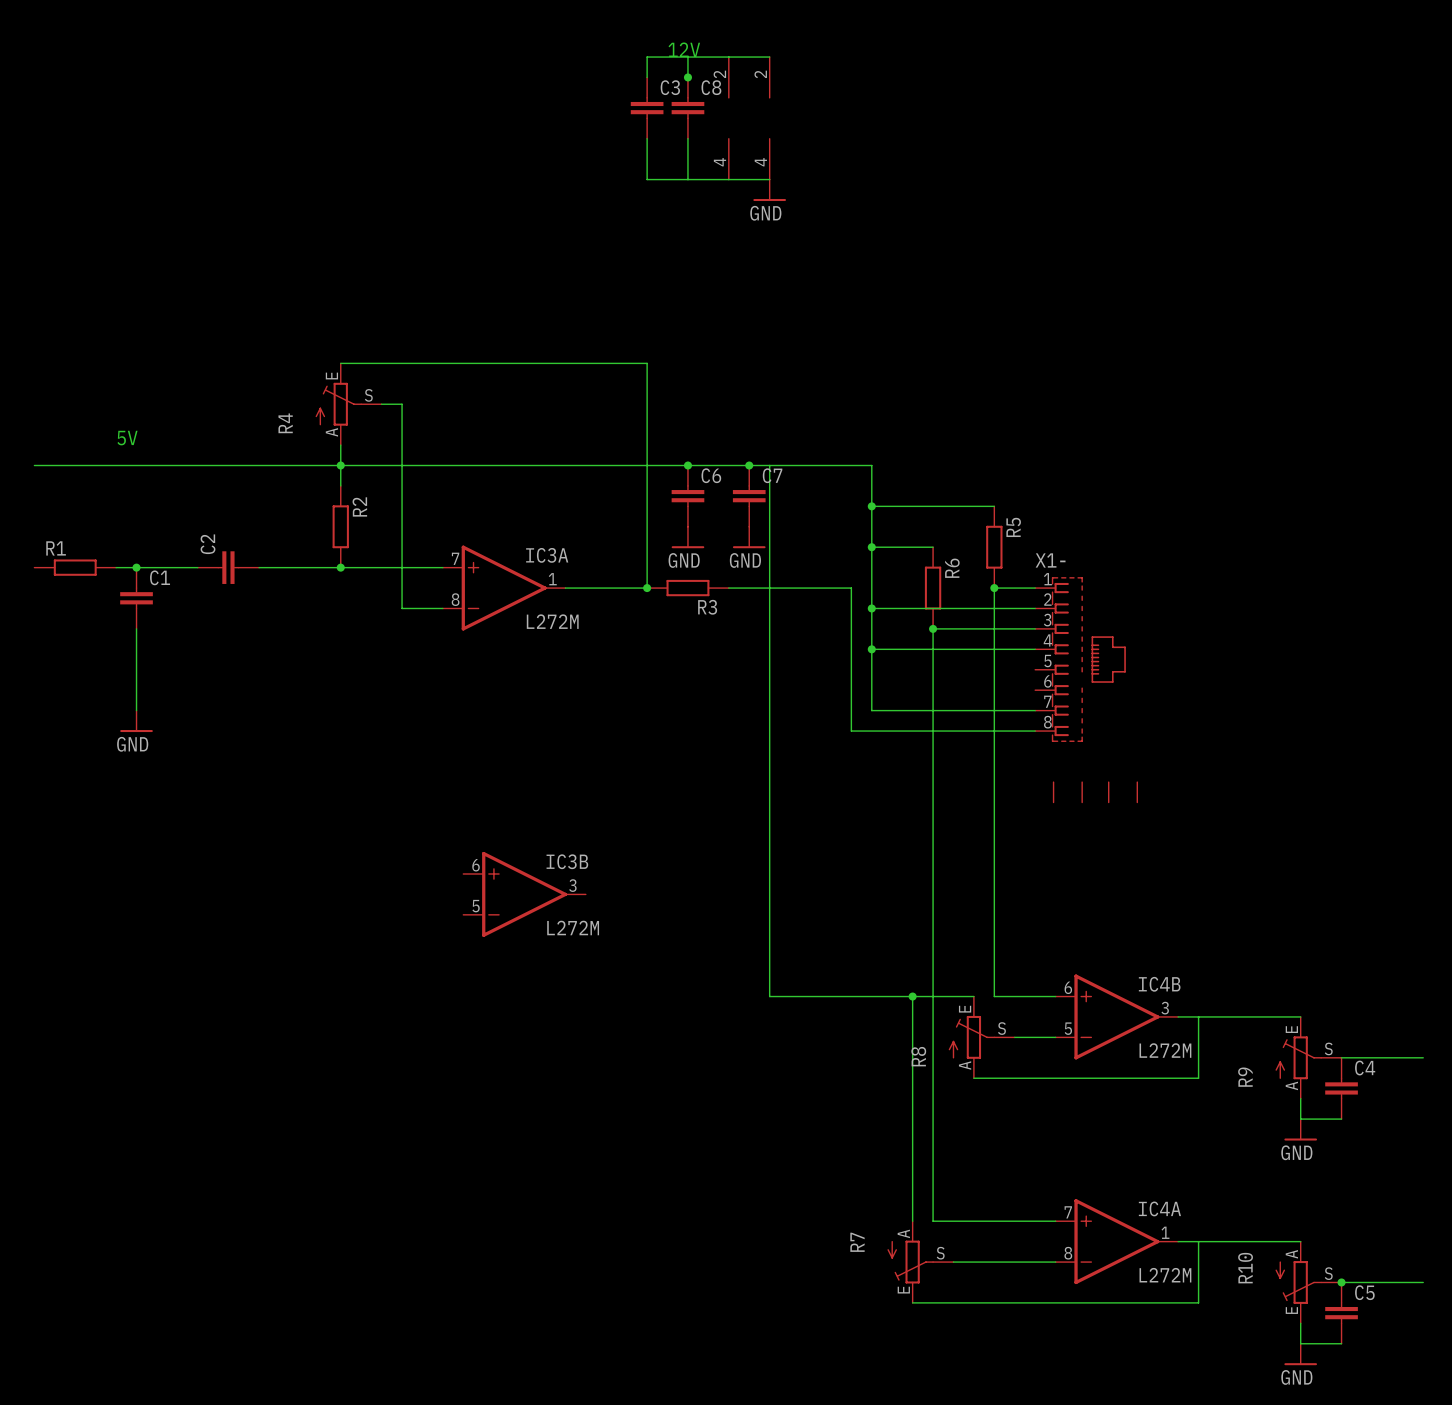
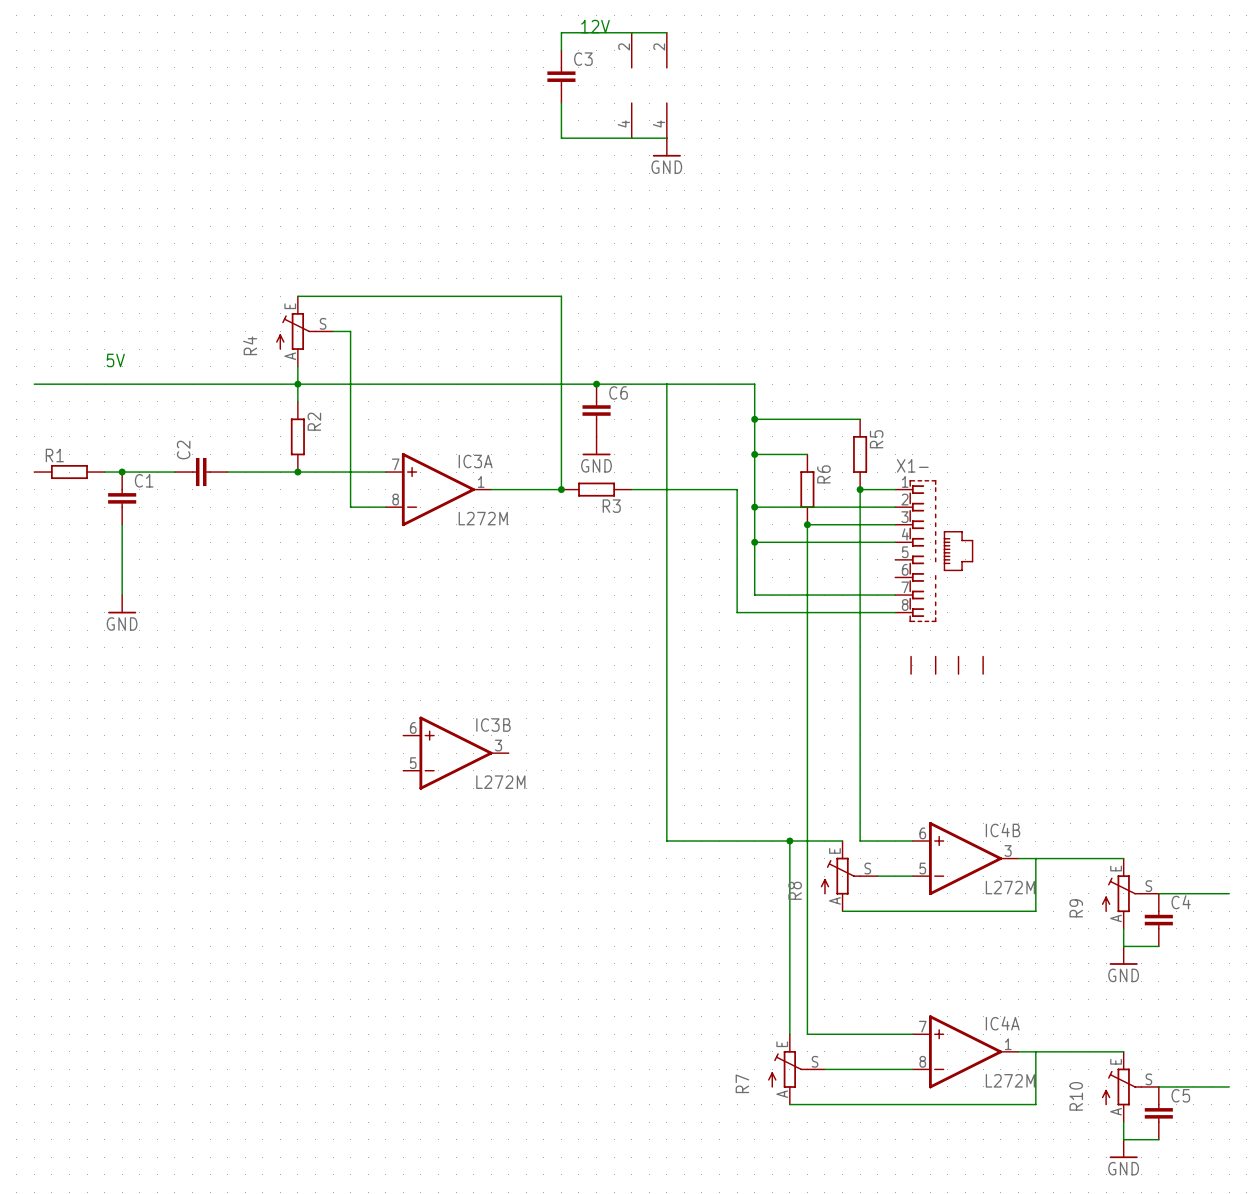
wire: (687, 57) (687, 77) -> none
junction: (687, 77) -> none
C8: (687, 108) -> none
wire: (687, 138) (687, 179) -> none
junction: (749, 465) -> none
C7: (749, 496) -> none
power symbol: GND (749, 537) -> none
R7 flip: as is (910, 1262) -> up-down (788, 1069)
R10 flip: as is (1298, 1282) -> up-down (1121, 1086)
junction: (1341, 1282) -> none

